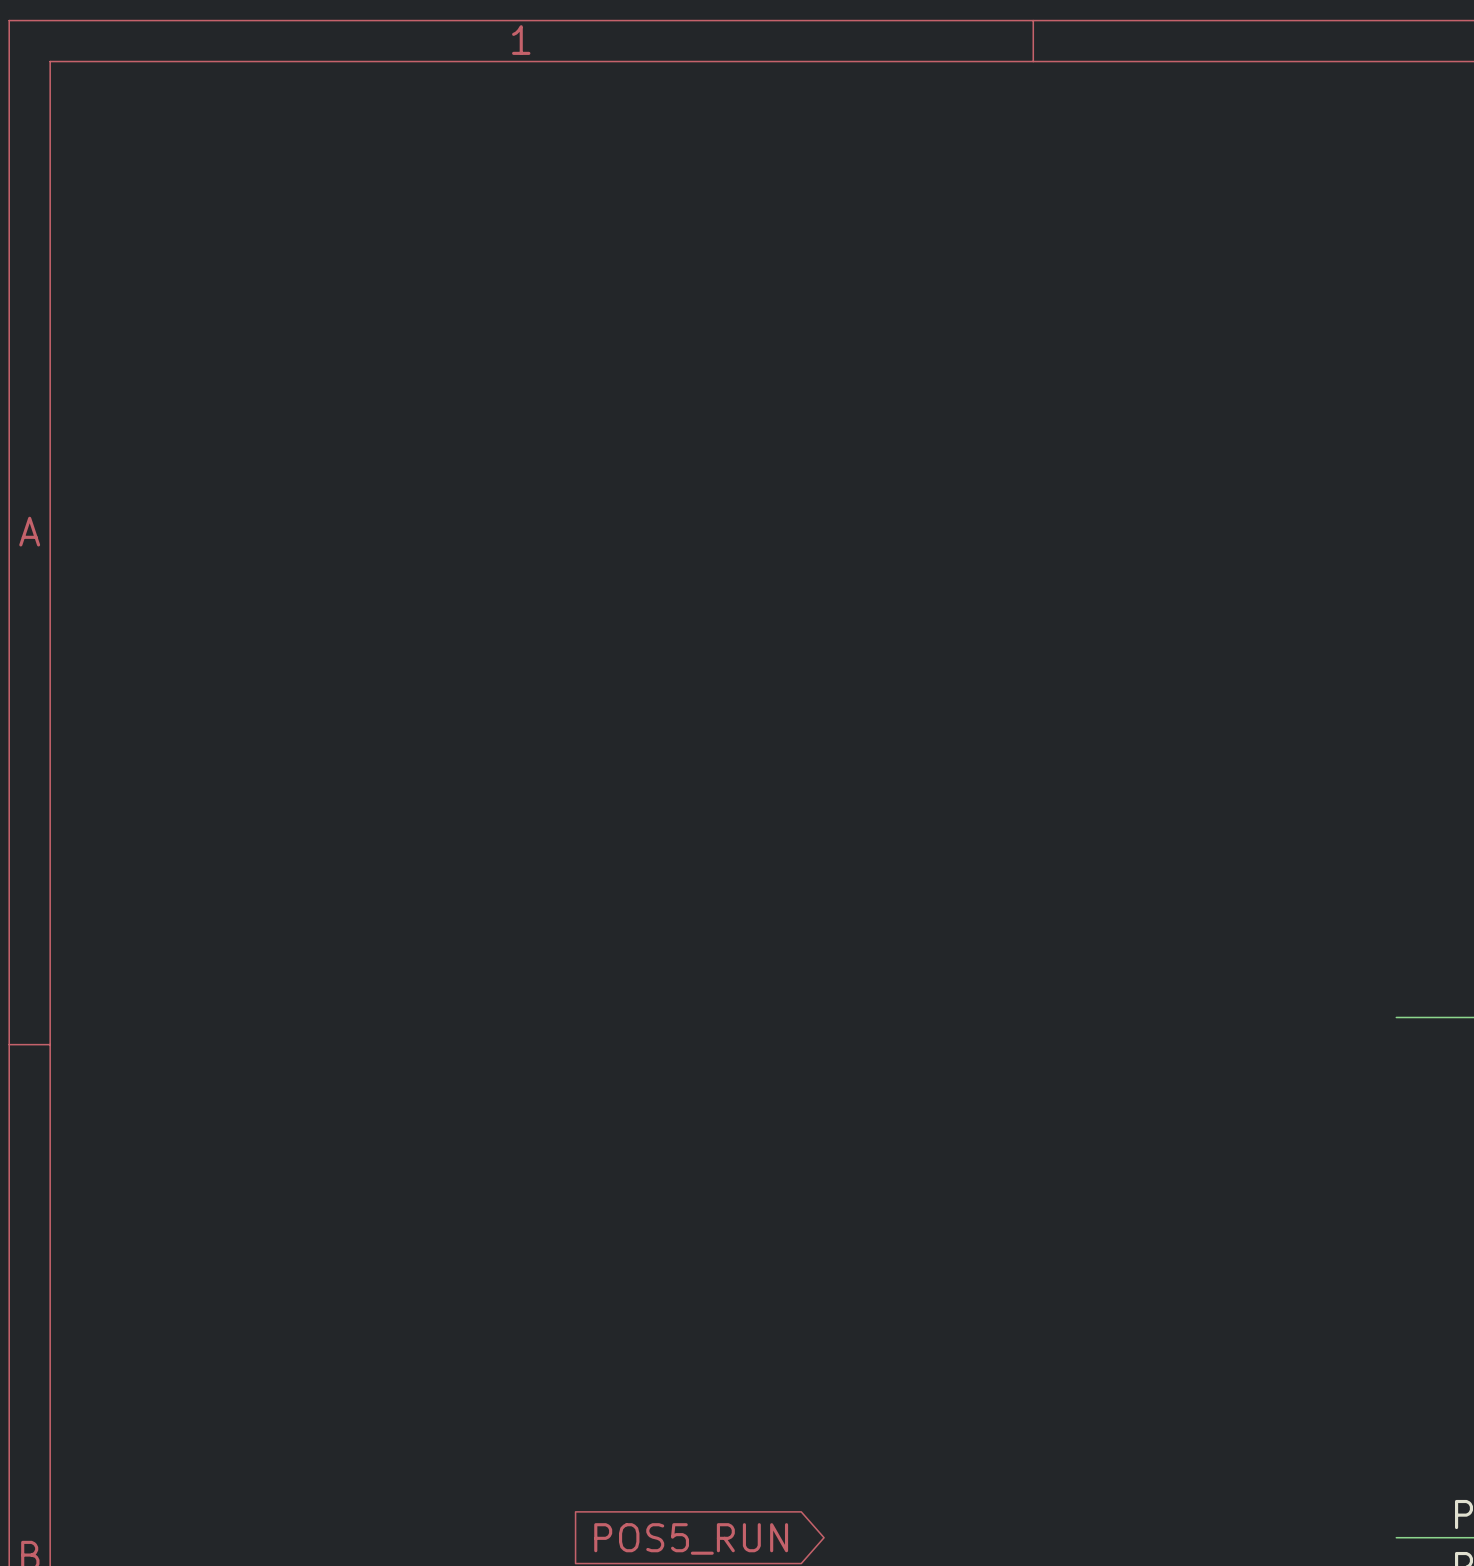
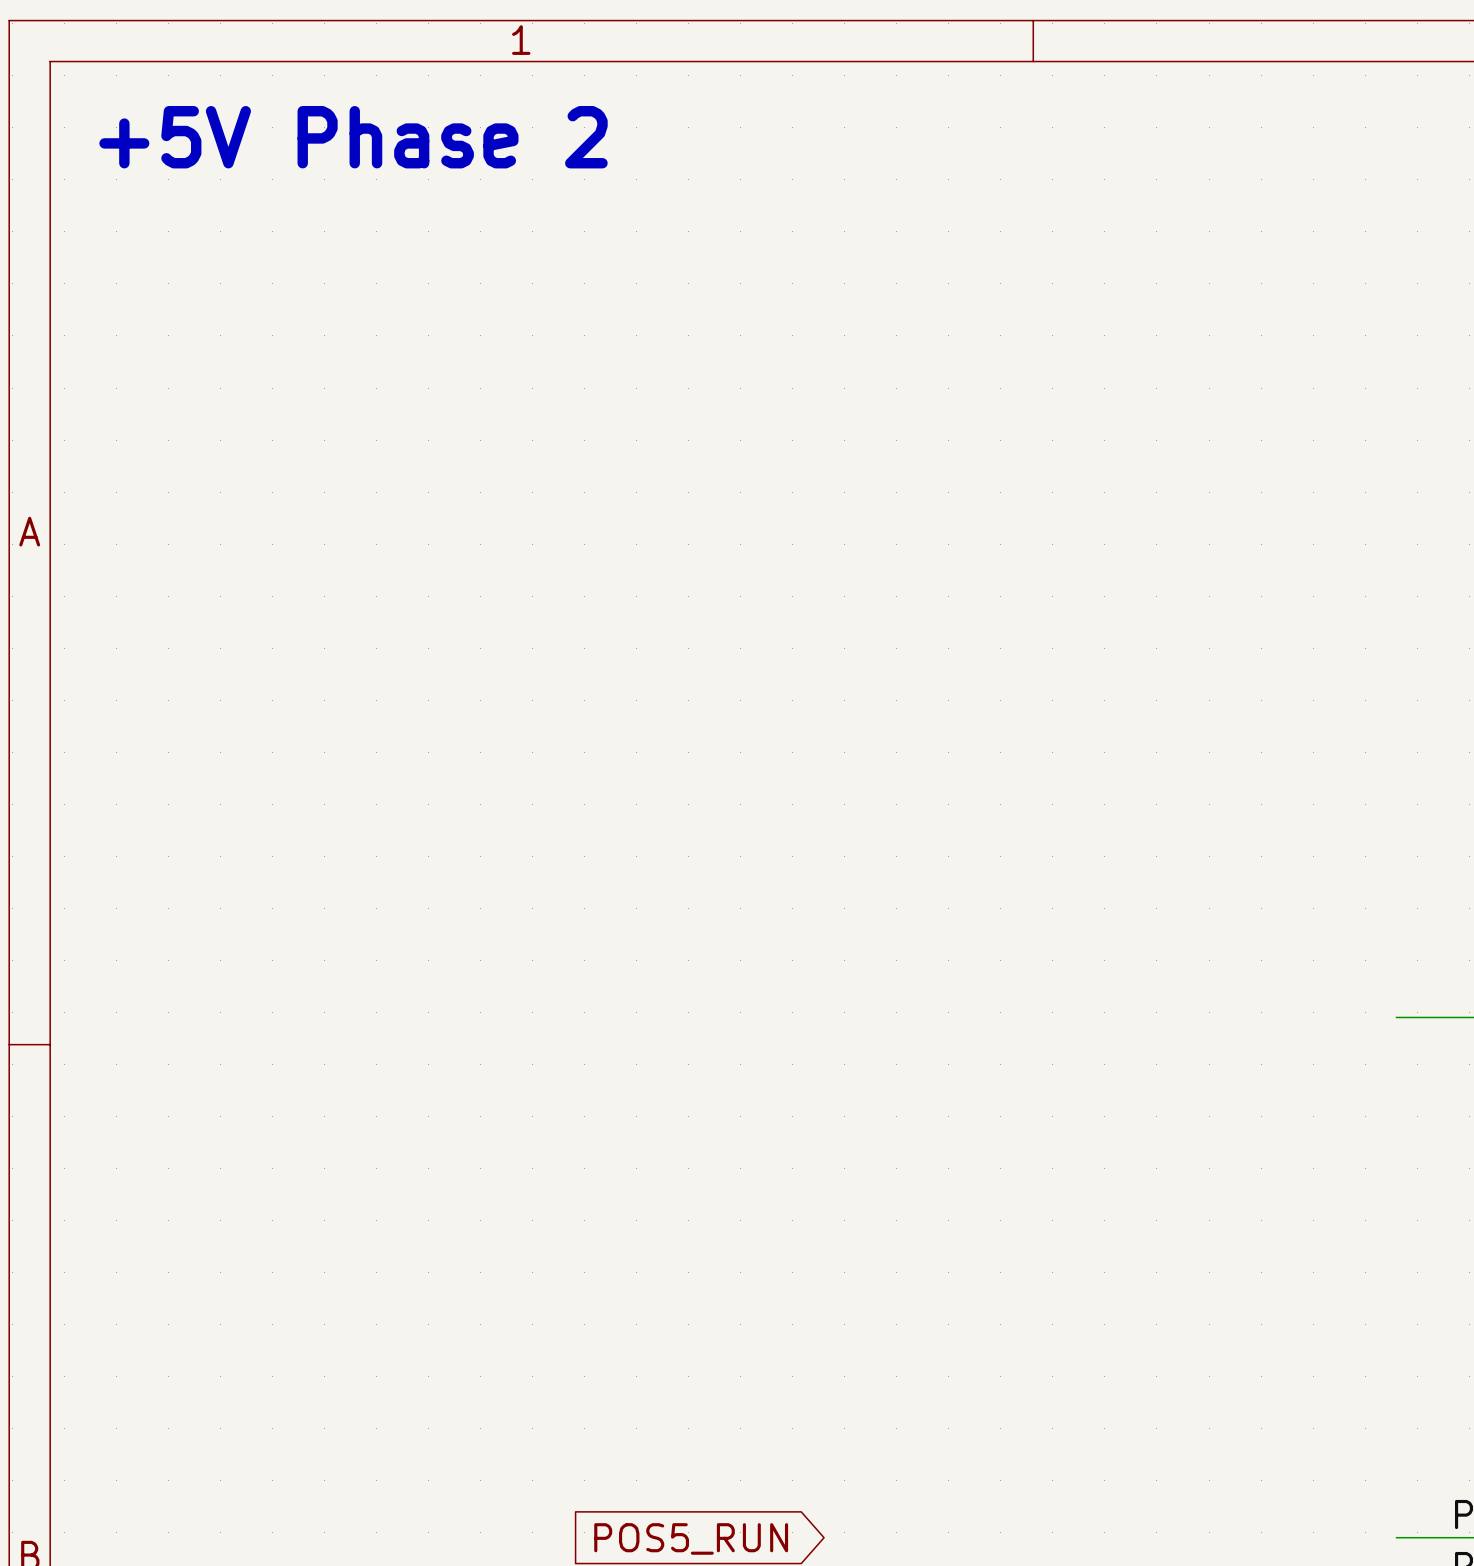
text: none -> +5V Phase 2 (353, 137)

